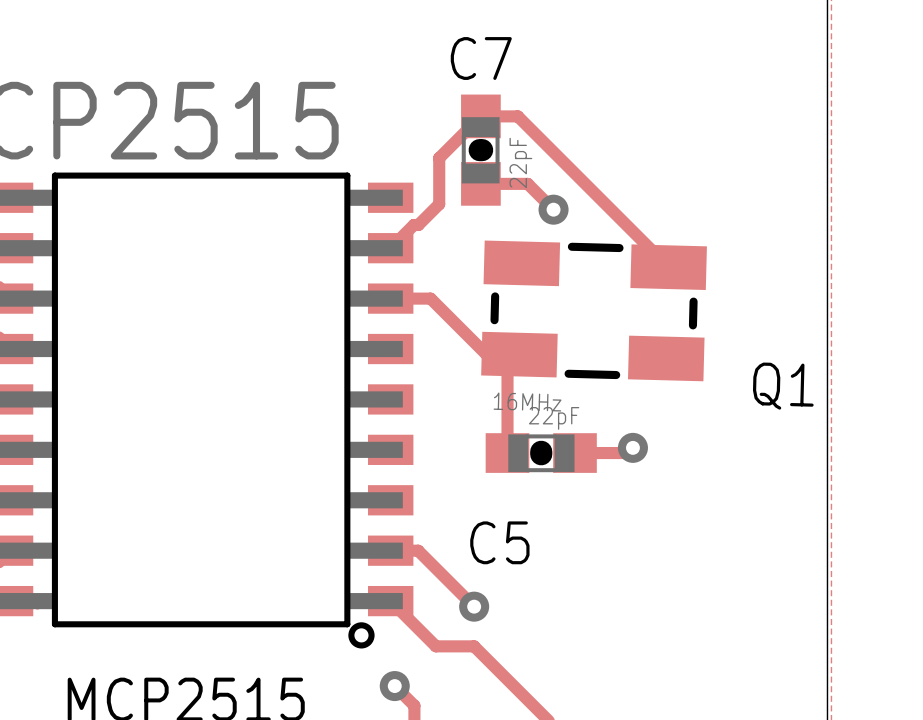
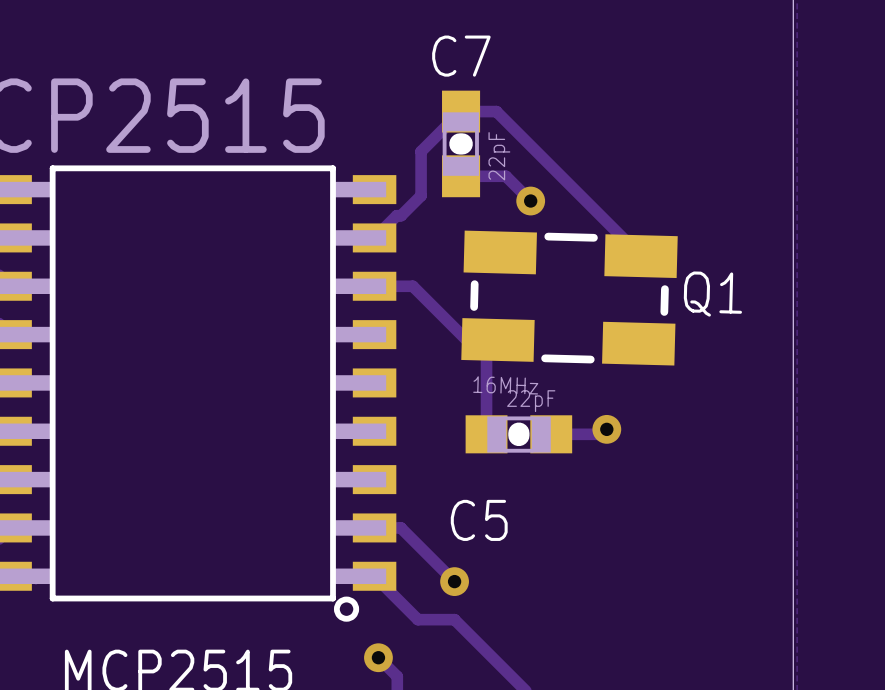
Q1 name position: Q1 (783, 386) -> Q1 (712, 294)

